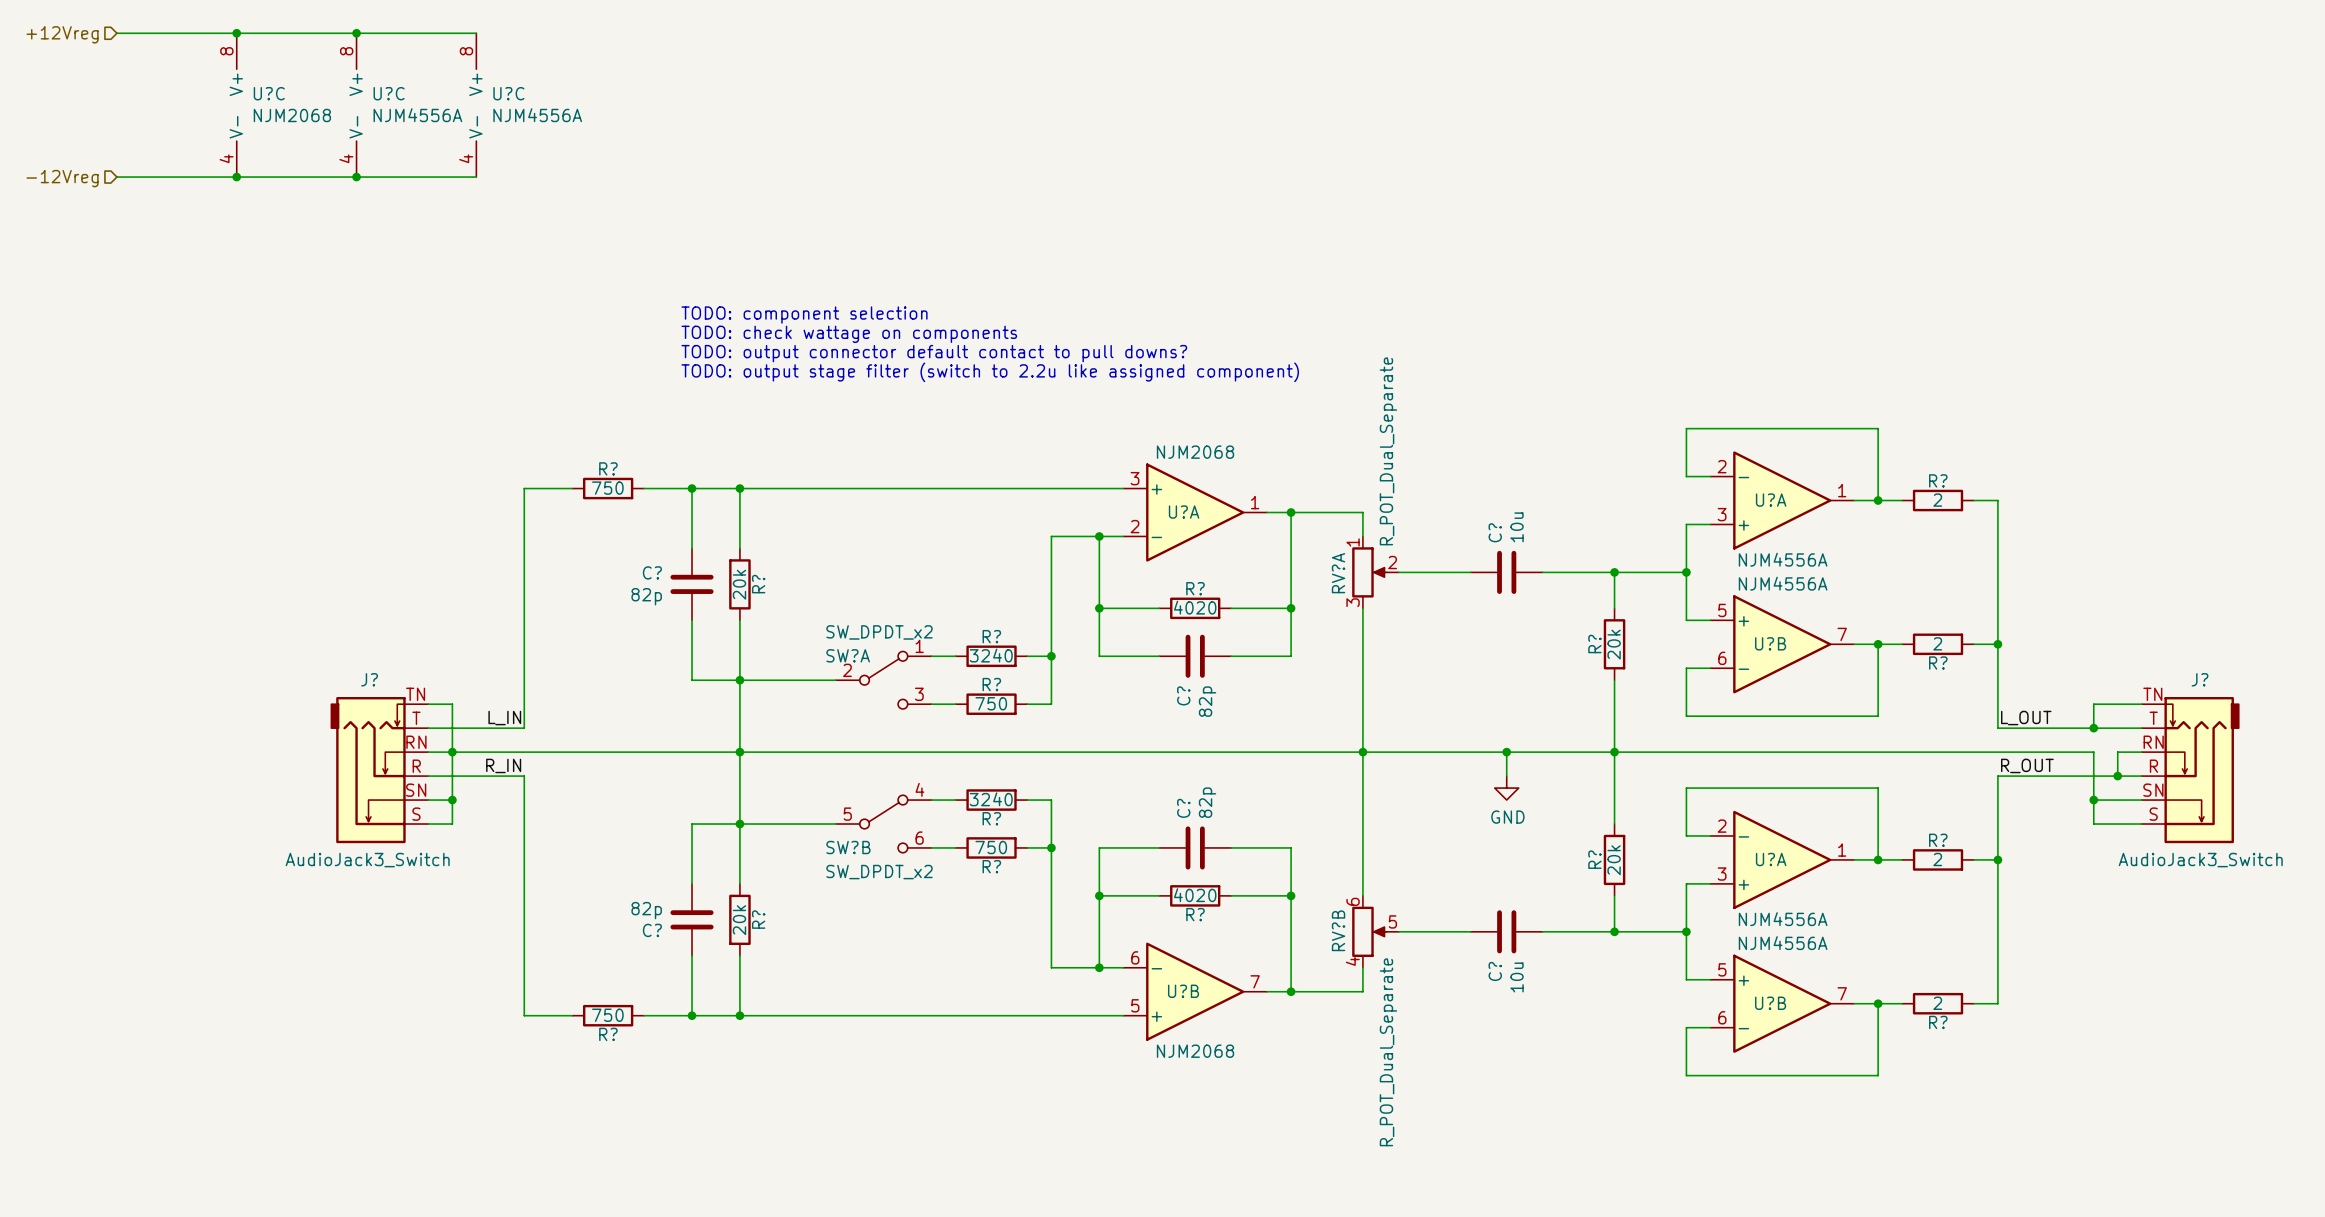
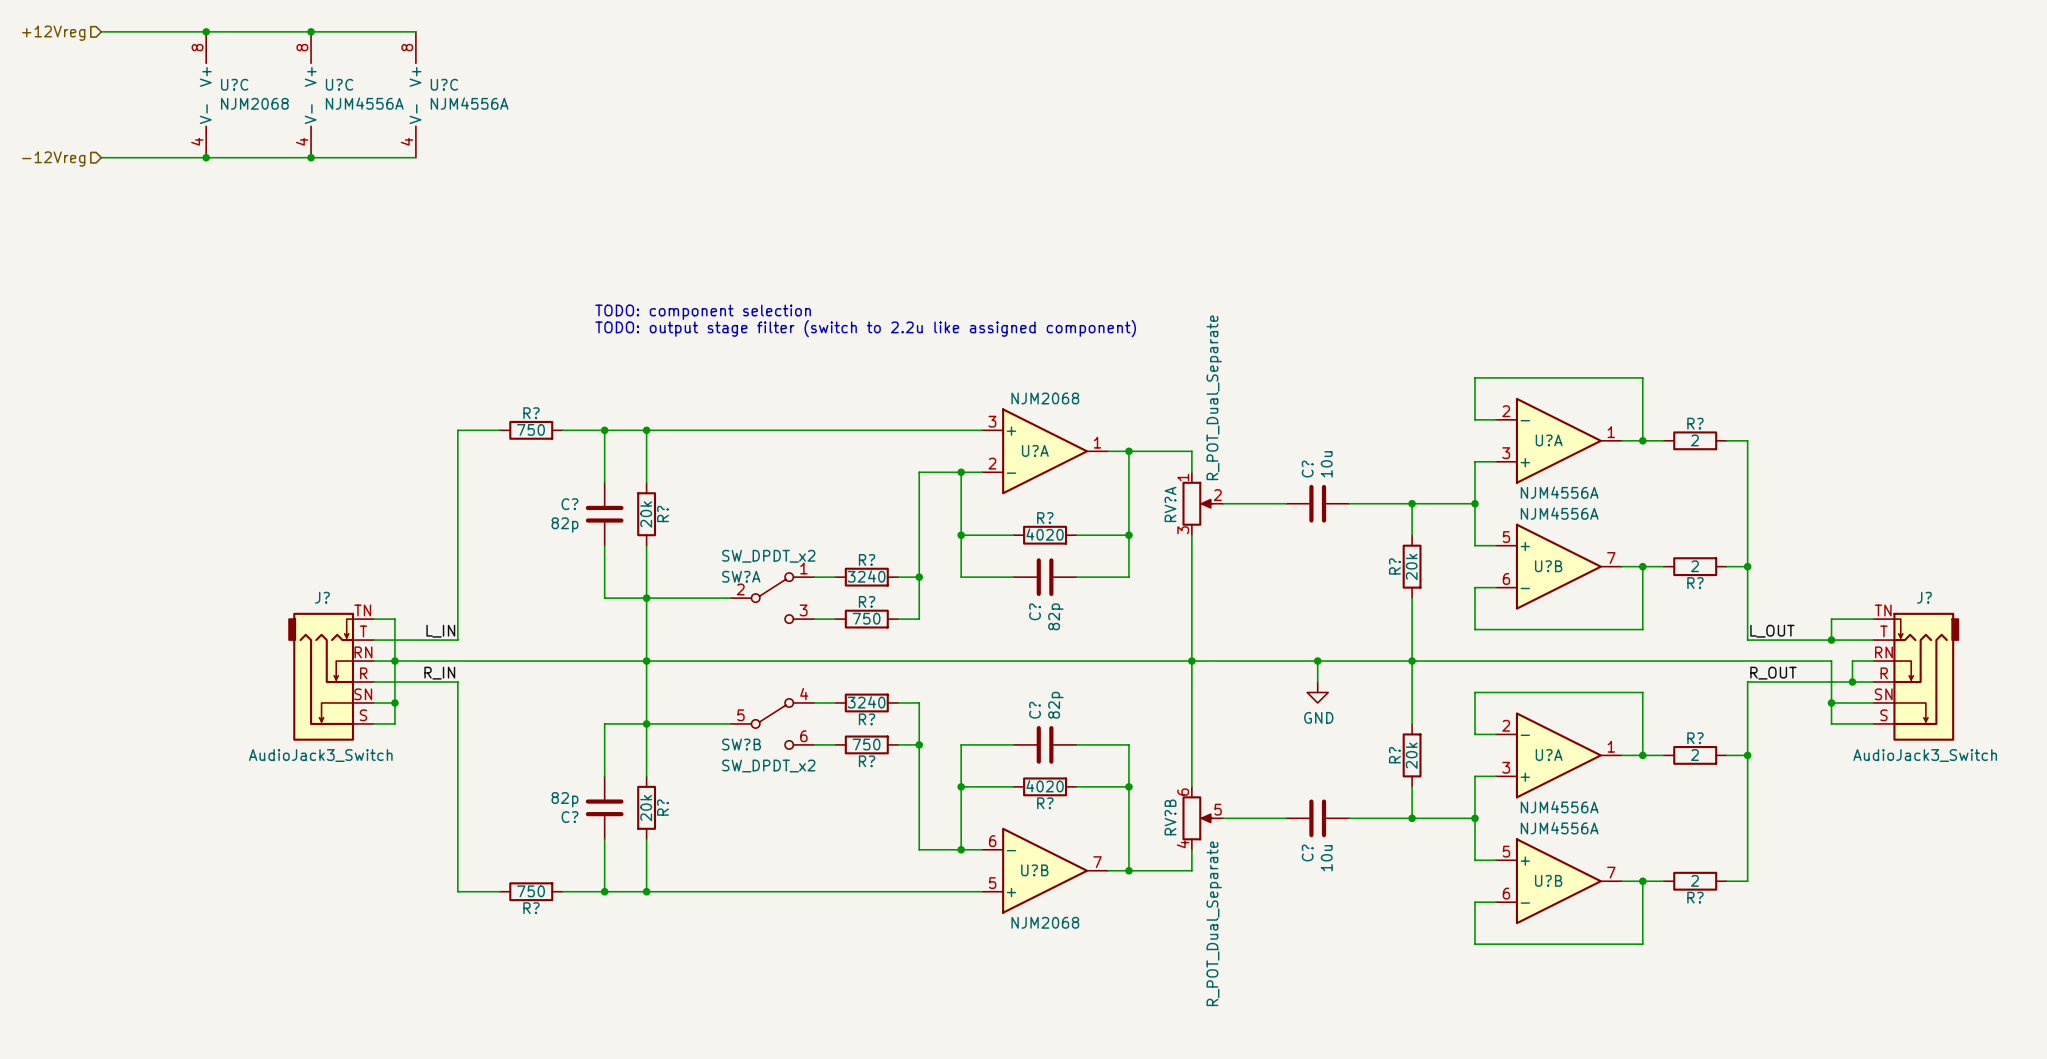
text: TODO: component selection (804, 315) -> none
text: TODO: check wattage on components (849, 334) -> none
text: TODO: output connector default contact to pull downs? (934, 353) -> TODO: component selection (703, 312)

